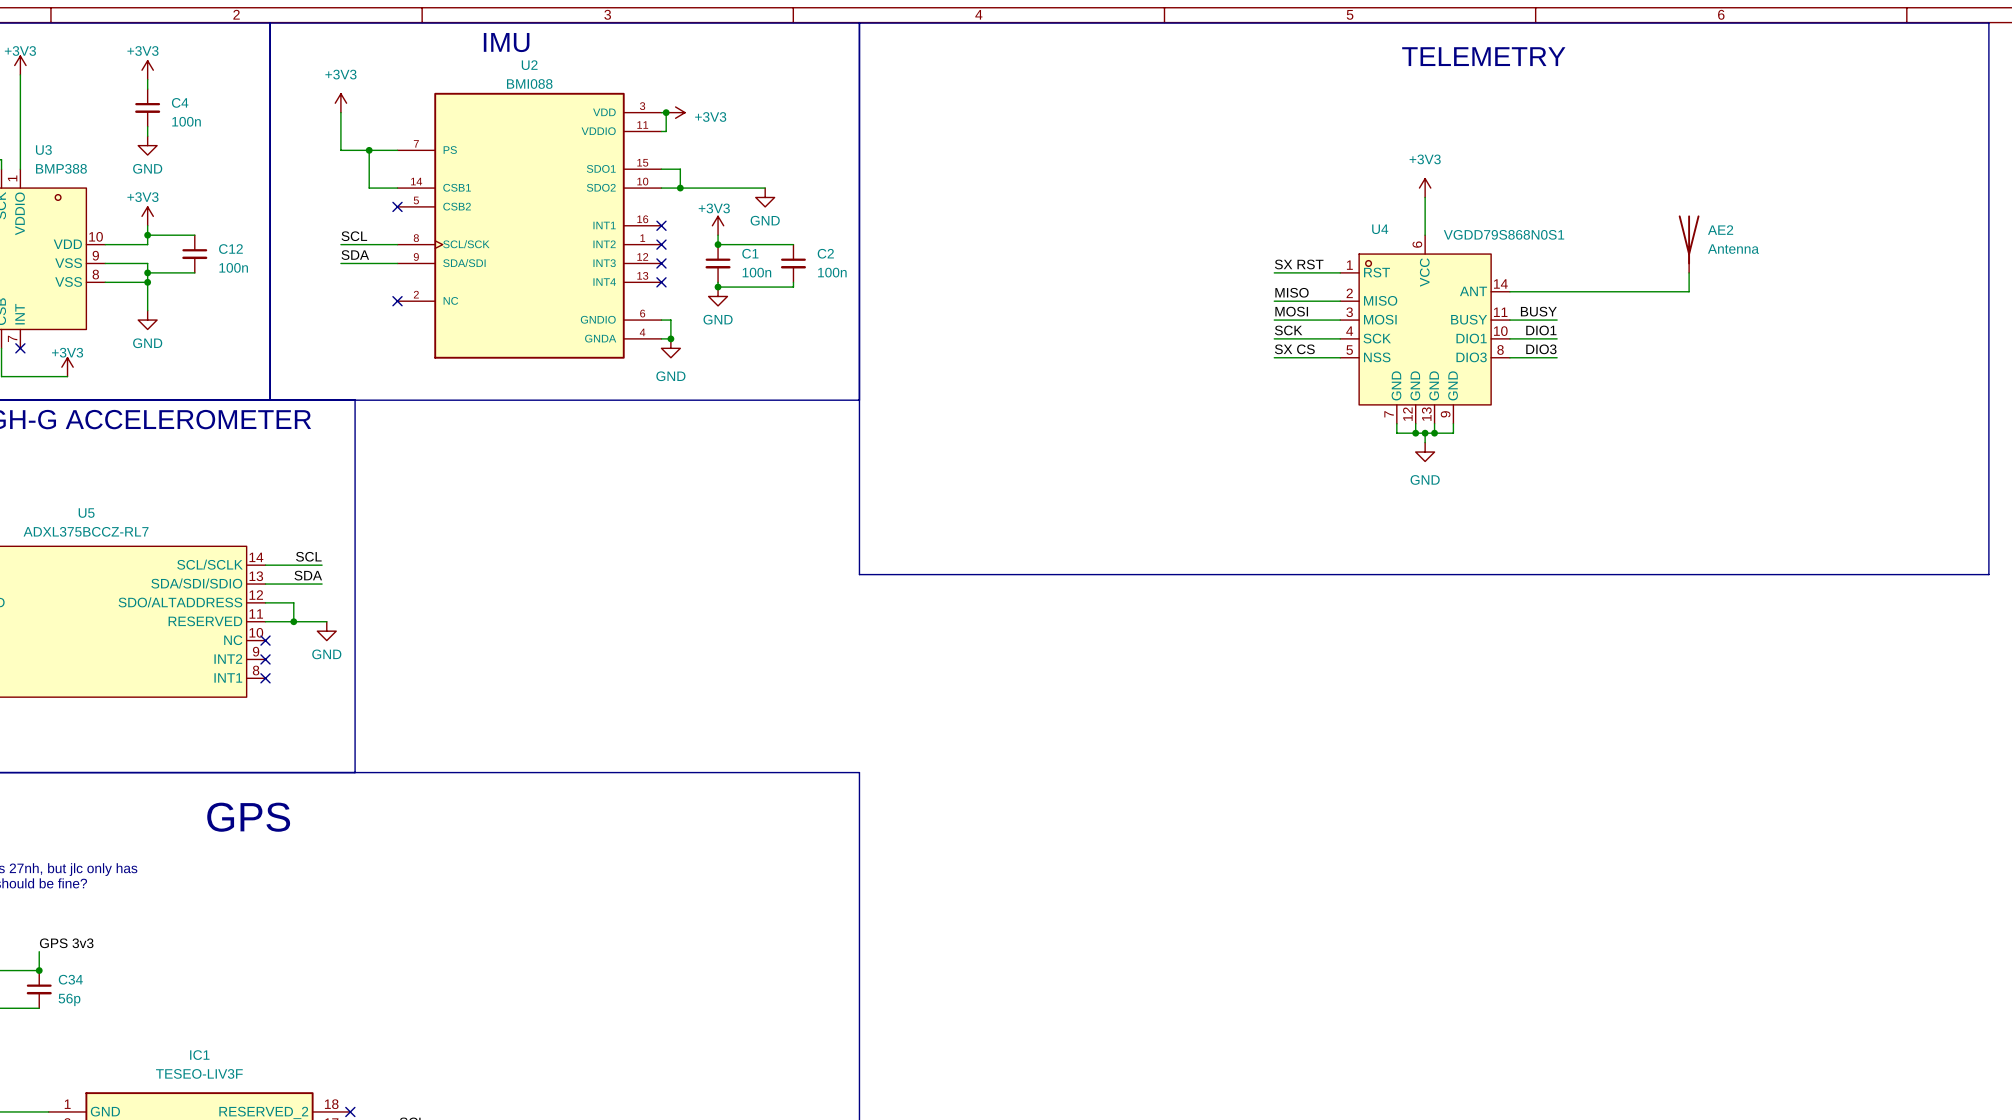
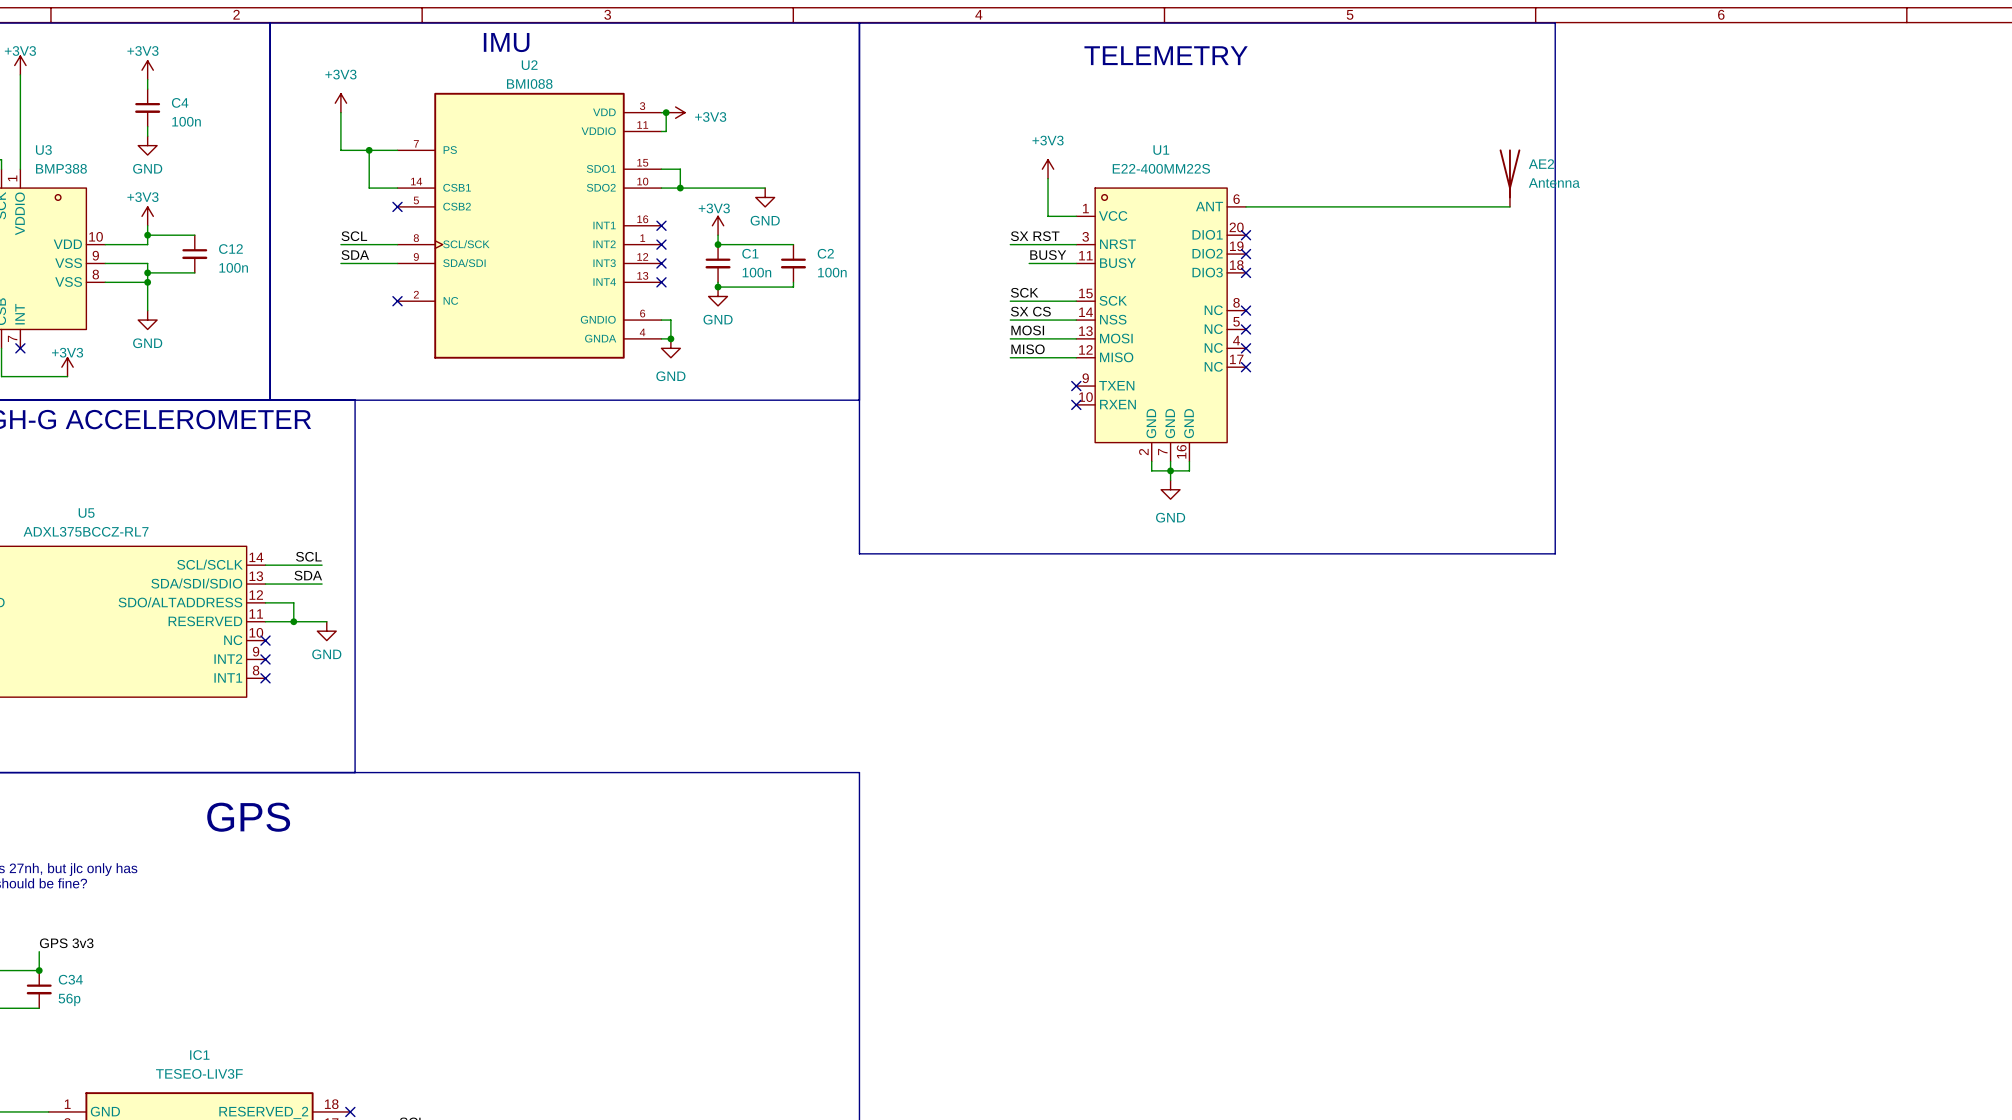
line: (1555, 23) (1988, 23) (1988, 574) (859, 574) (859, 553) -> (1555, 23) (1555, 553) (859, 553)
text: none -> TELEMETRY (1166, 55)
text: TELEMETRY (1483, 56) -> none
power symbol: none -> +3V3 (1048, 169)
wire: none -> (1048, 178) (1048, 216) (1076, 216)
power symbol: +3V3 (1425, 188) -> none
wire: (1425, 197) (1425, 235) -> none
wire: none -> (1245, 206) (1509, 206)
no-connect mark: none -> (1245, 235)
label: none -> SX RST (1035, 236)
wire: none -> (1010, 244) (1076, 244)
AE2 position: (1689, 244) -> (1509, 178)
no-connect mark: none -> (1245, 254)
label: none -> BUSY (1048, 255)
wire: none -> (1029, 263) (1076, 263)
label: SX RST (1299, 264) -> none
no-connect mark: none -> (1245, 272)
wire: (1274, 272) (1340, 272) -> none
wire: (1689, 272) (1689, 291) (1509, 291) -> none
label: none -> SCK (1024, 292)
label: MISO (1292, 292) -> none
wire: none -> (1010, 301) (1076, 301)
wire: (1274, 301) (1340, 301) -> none
no-connect mark: none -> (1245, 310)
label: none -> SX CS (1030, 311)
label: MOSI (1291, 311) -> none
label: BUSY (1538, 311) -> none
wire: none -> (1010, 320) (1076, 320)
wire: (1274, 320) (1340, 320) -> none
wire: (1509, 320) (1557, 320) -> none
U1: none -> E22-400MM22S (1161, 324)
no-connect mark: none -> (1245, 329)
U4: VGDD79S868N0S1 (1425, 329) -> none
label: none -> MOSI (1027, 330)
label: SCK (1288, 330) -> none
label: DIO1 (1541, 330) -> none
wire: none -> (1010, 338) (1076, 338)
wire: (1274, 338) (1340, 338) -> none
wire: (1509, 338) (1557, 338) -> none
no-connect mark: none -> (1245, 348)
label: none -> MISO (1028, 349)
label: SX CS (1294, 349) -> none
label: DIO3 (1541, 349) -> none
wire: none -> (1010, 357) (1076, 357)
wire: (1274, 357) (1340, 357) -> none
wire: (1509, 357) (1557, 357) -> none
no-connect mark: none -> (1245, 367)
no-connect mark: none -> (1076, 386)
no-connect mark: none -> (1076, 404)
wire: (1396, 423) (1396, 433) (1453, 433) (1453, 423) -> none
wire: (1415, 423) (1415, 433) -> none
wire: (1434, 423) (1434, 433) -> none
junction: (1415, 433) -> none
wire: (1425, 433) (1425, 442) -> none
junction: (1425, 433) -> none
junction: (1434, 433) -> none
power symbol: GND (1425, 452) -> none
wire: none -> (1151, 461) (1151, 470) (1189, 470) (1189, 461)
wire: none -> (1170, 461) (1170, 480)
junction: none -> (1170, 470)
power symbol: none -> GND (1170, 489)

